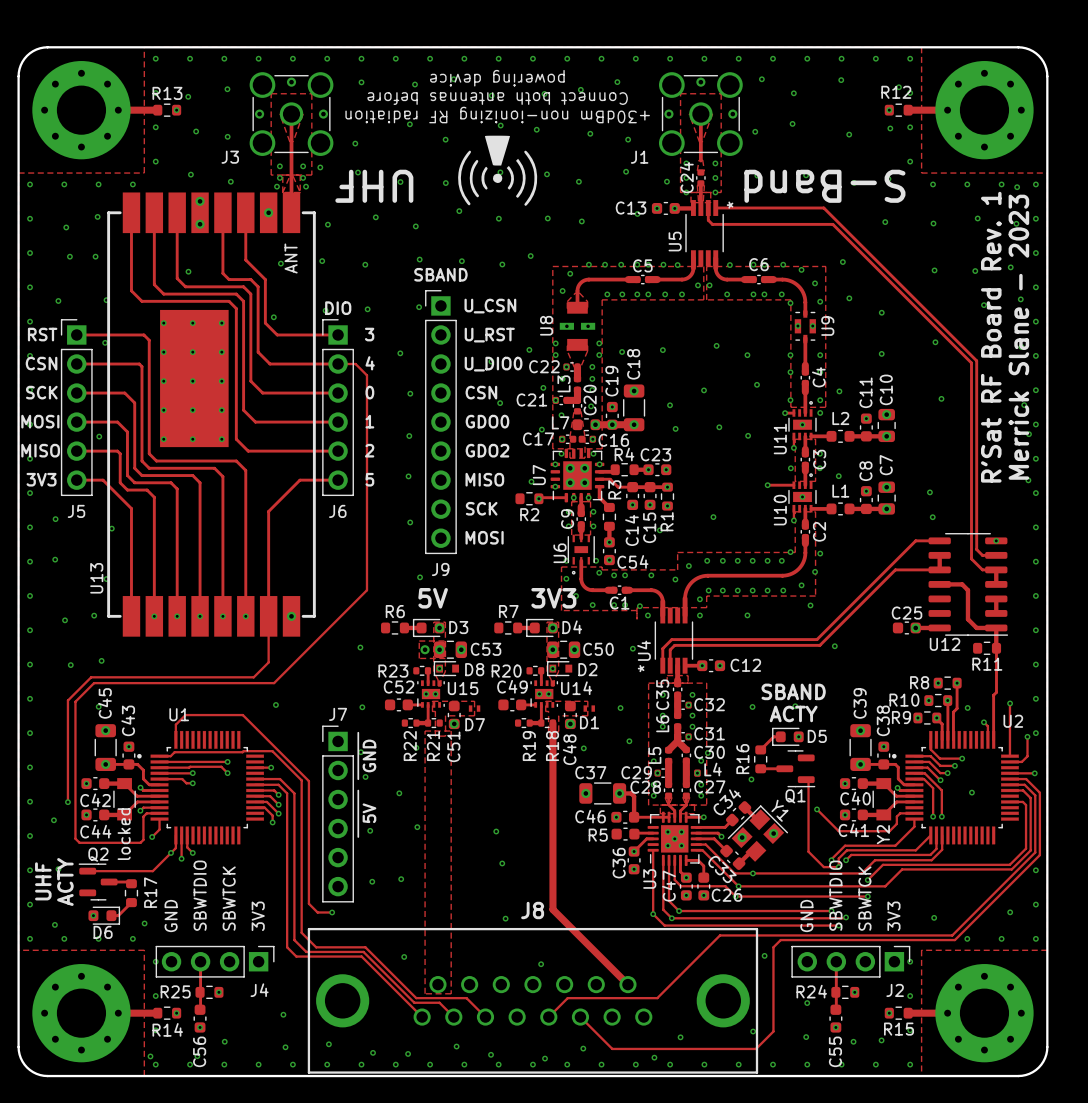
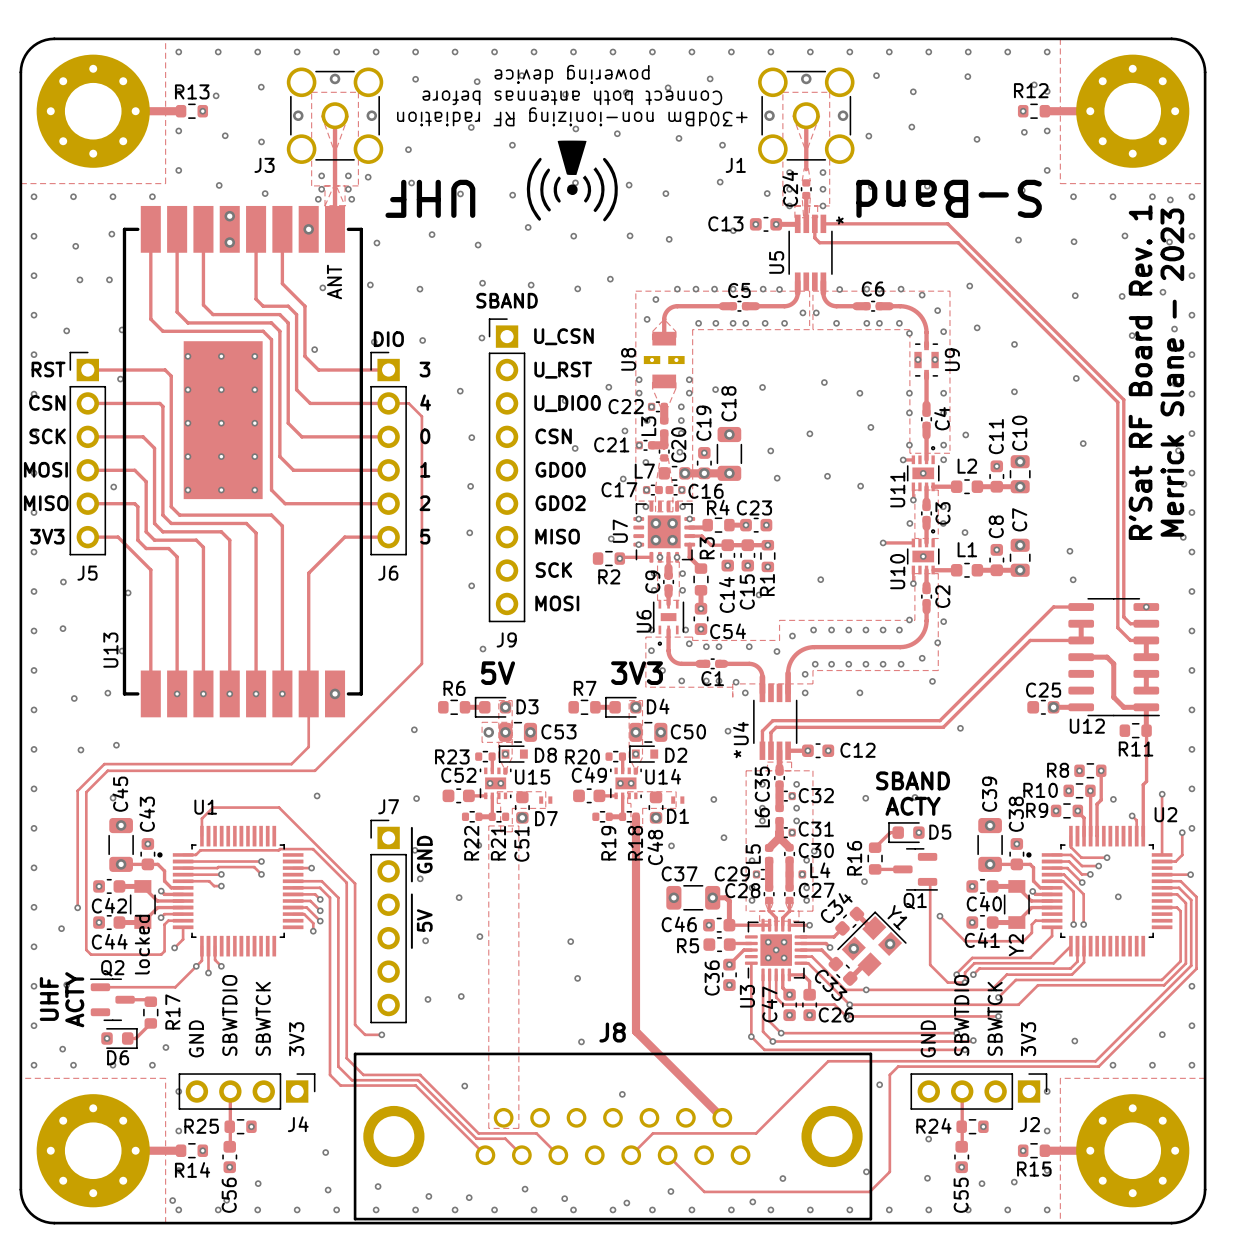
via: (188, 271) -> none

